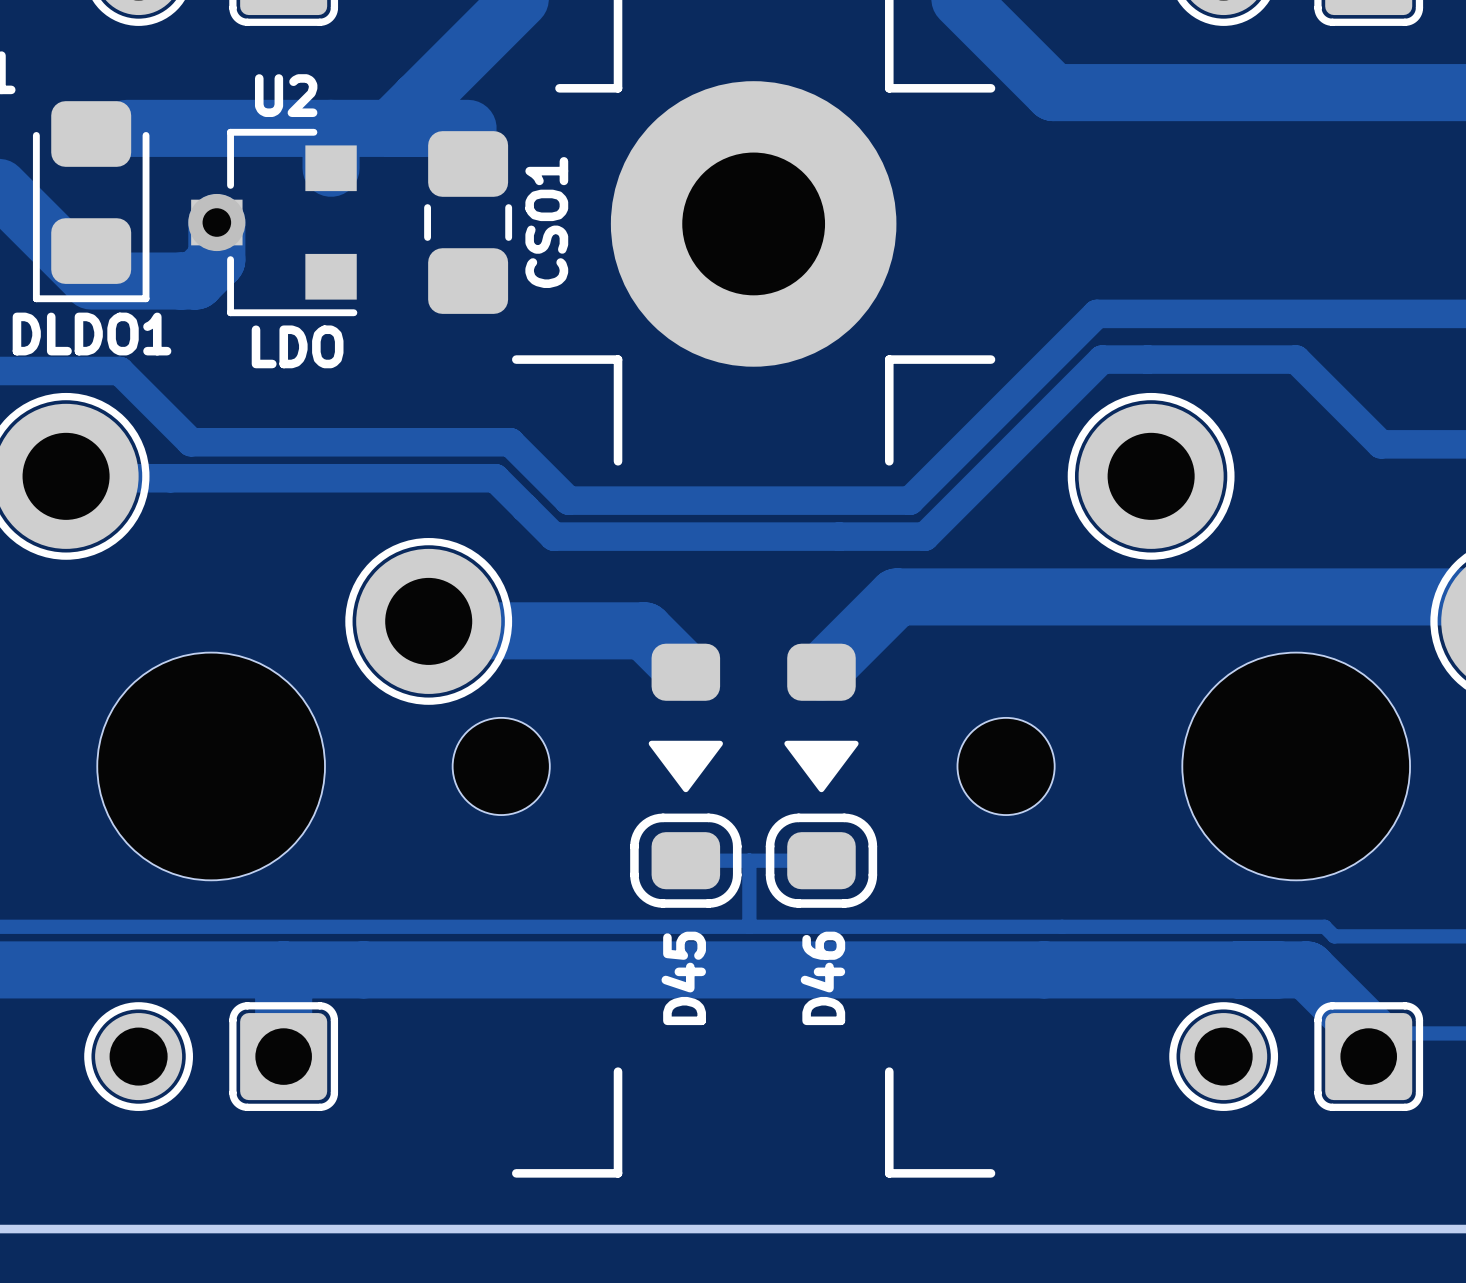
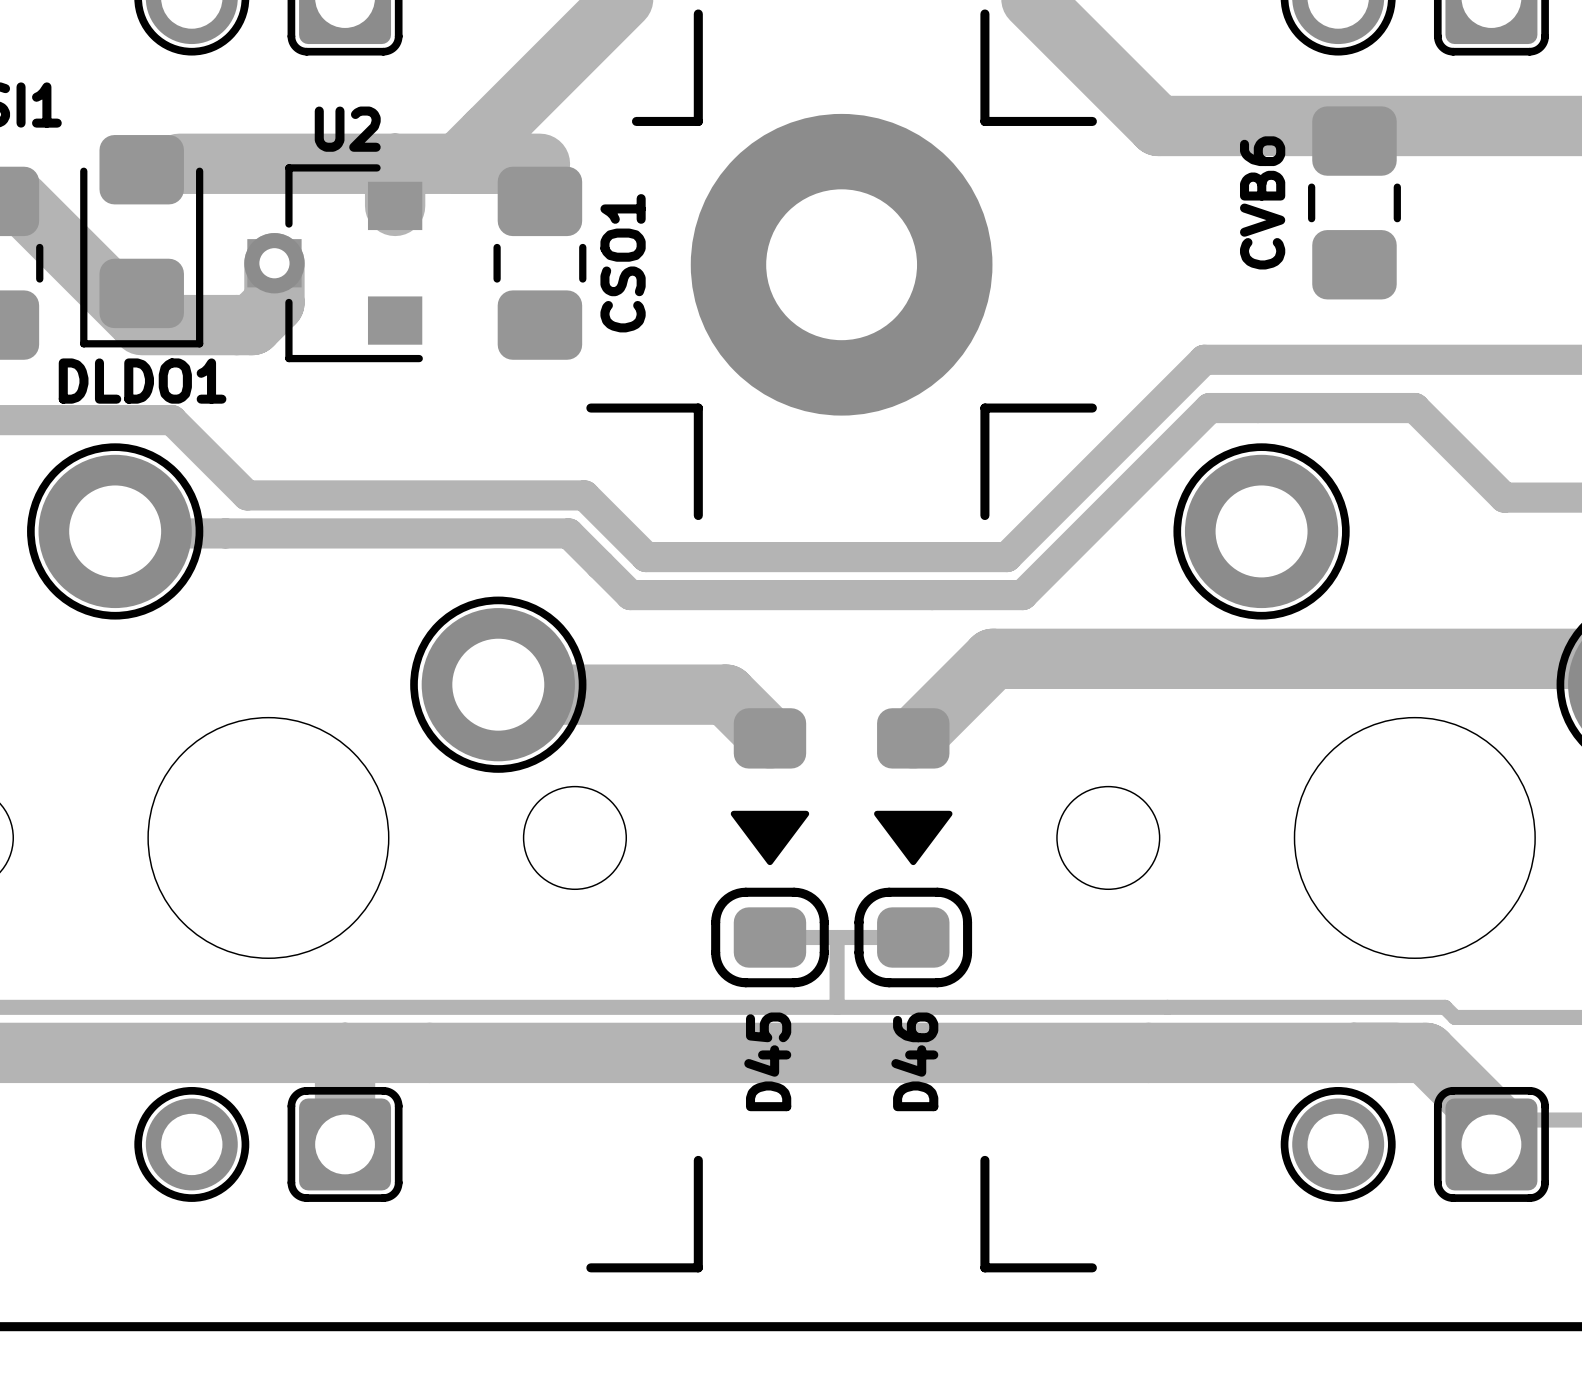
CVB6: none -> (1354, 202)
text: LDO (297, 346) -> none

